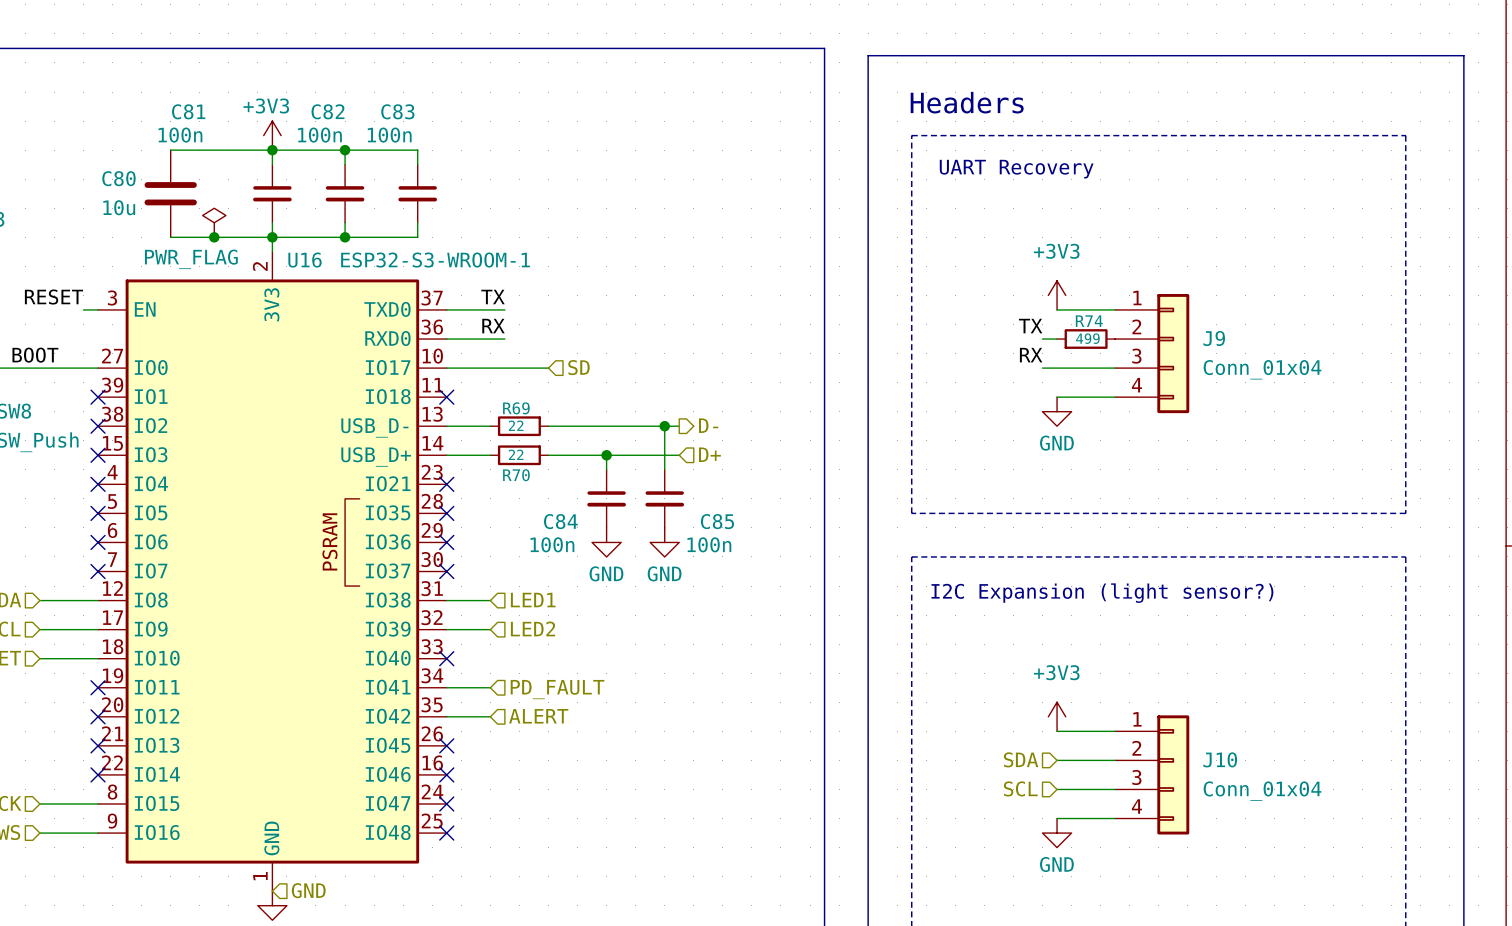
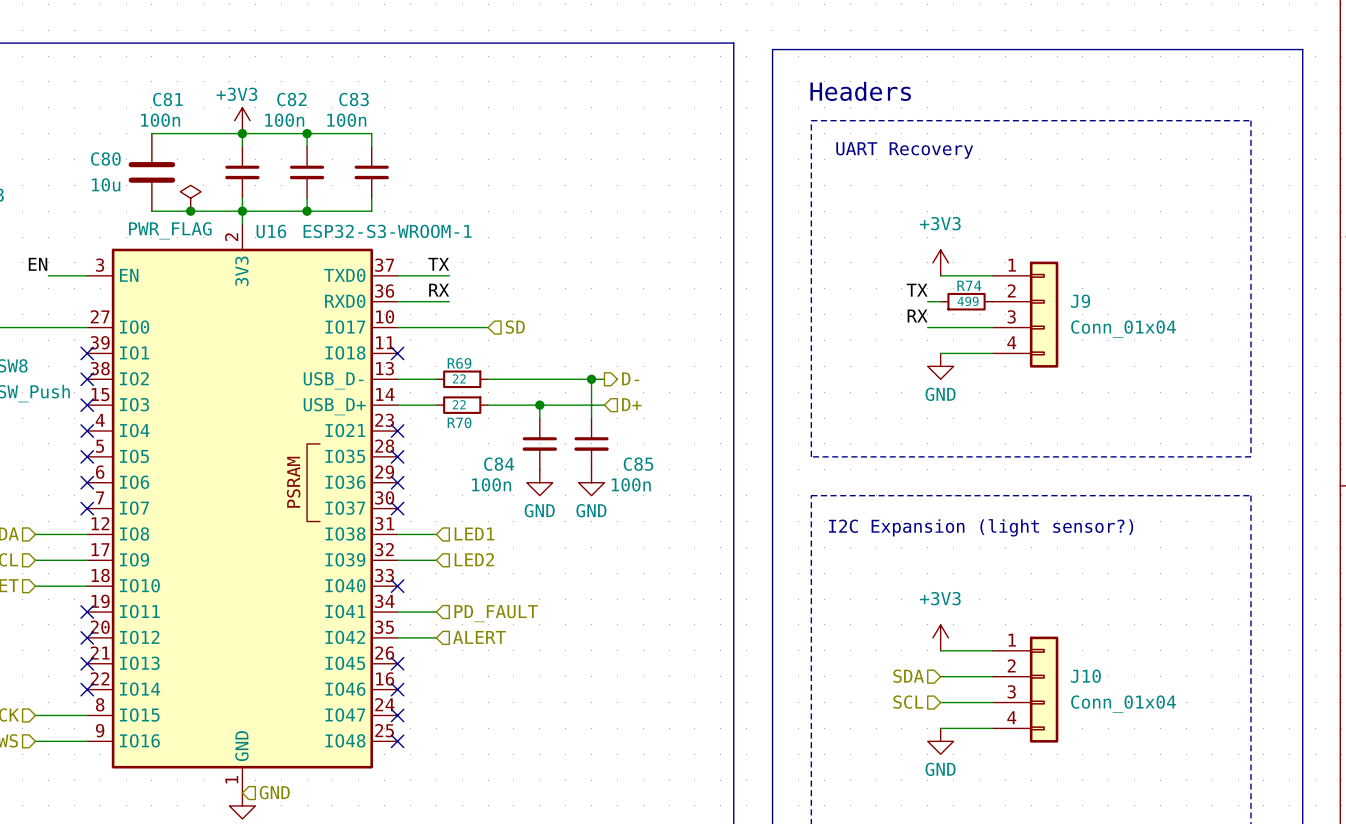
label: none -> EN (38, 264)
label: RESET (53, 297) -> none
wire: none -> (48, 275) (74, 275)
label: BOOT (35, 355) -> none

